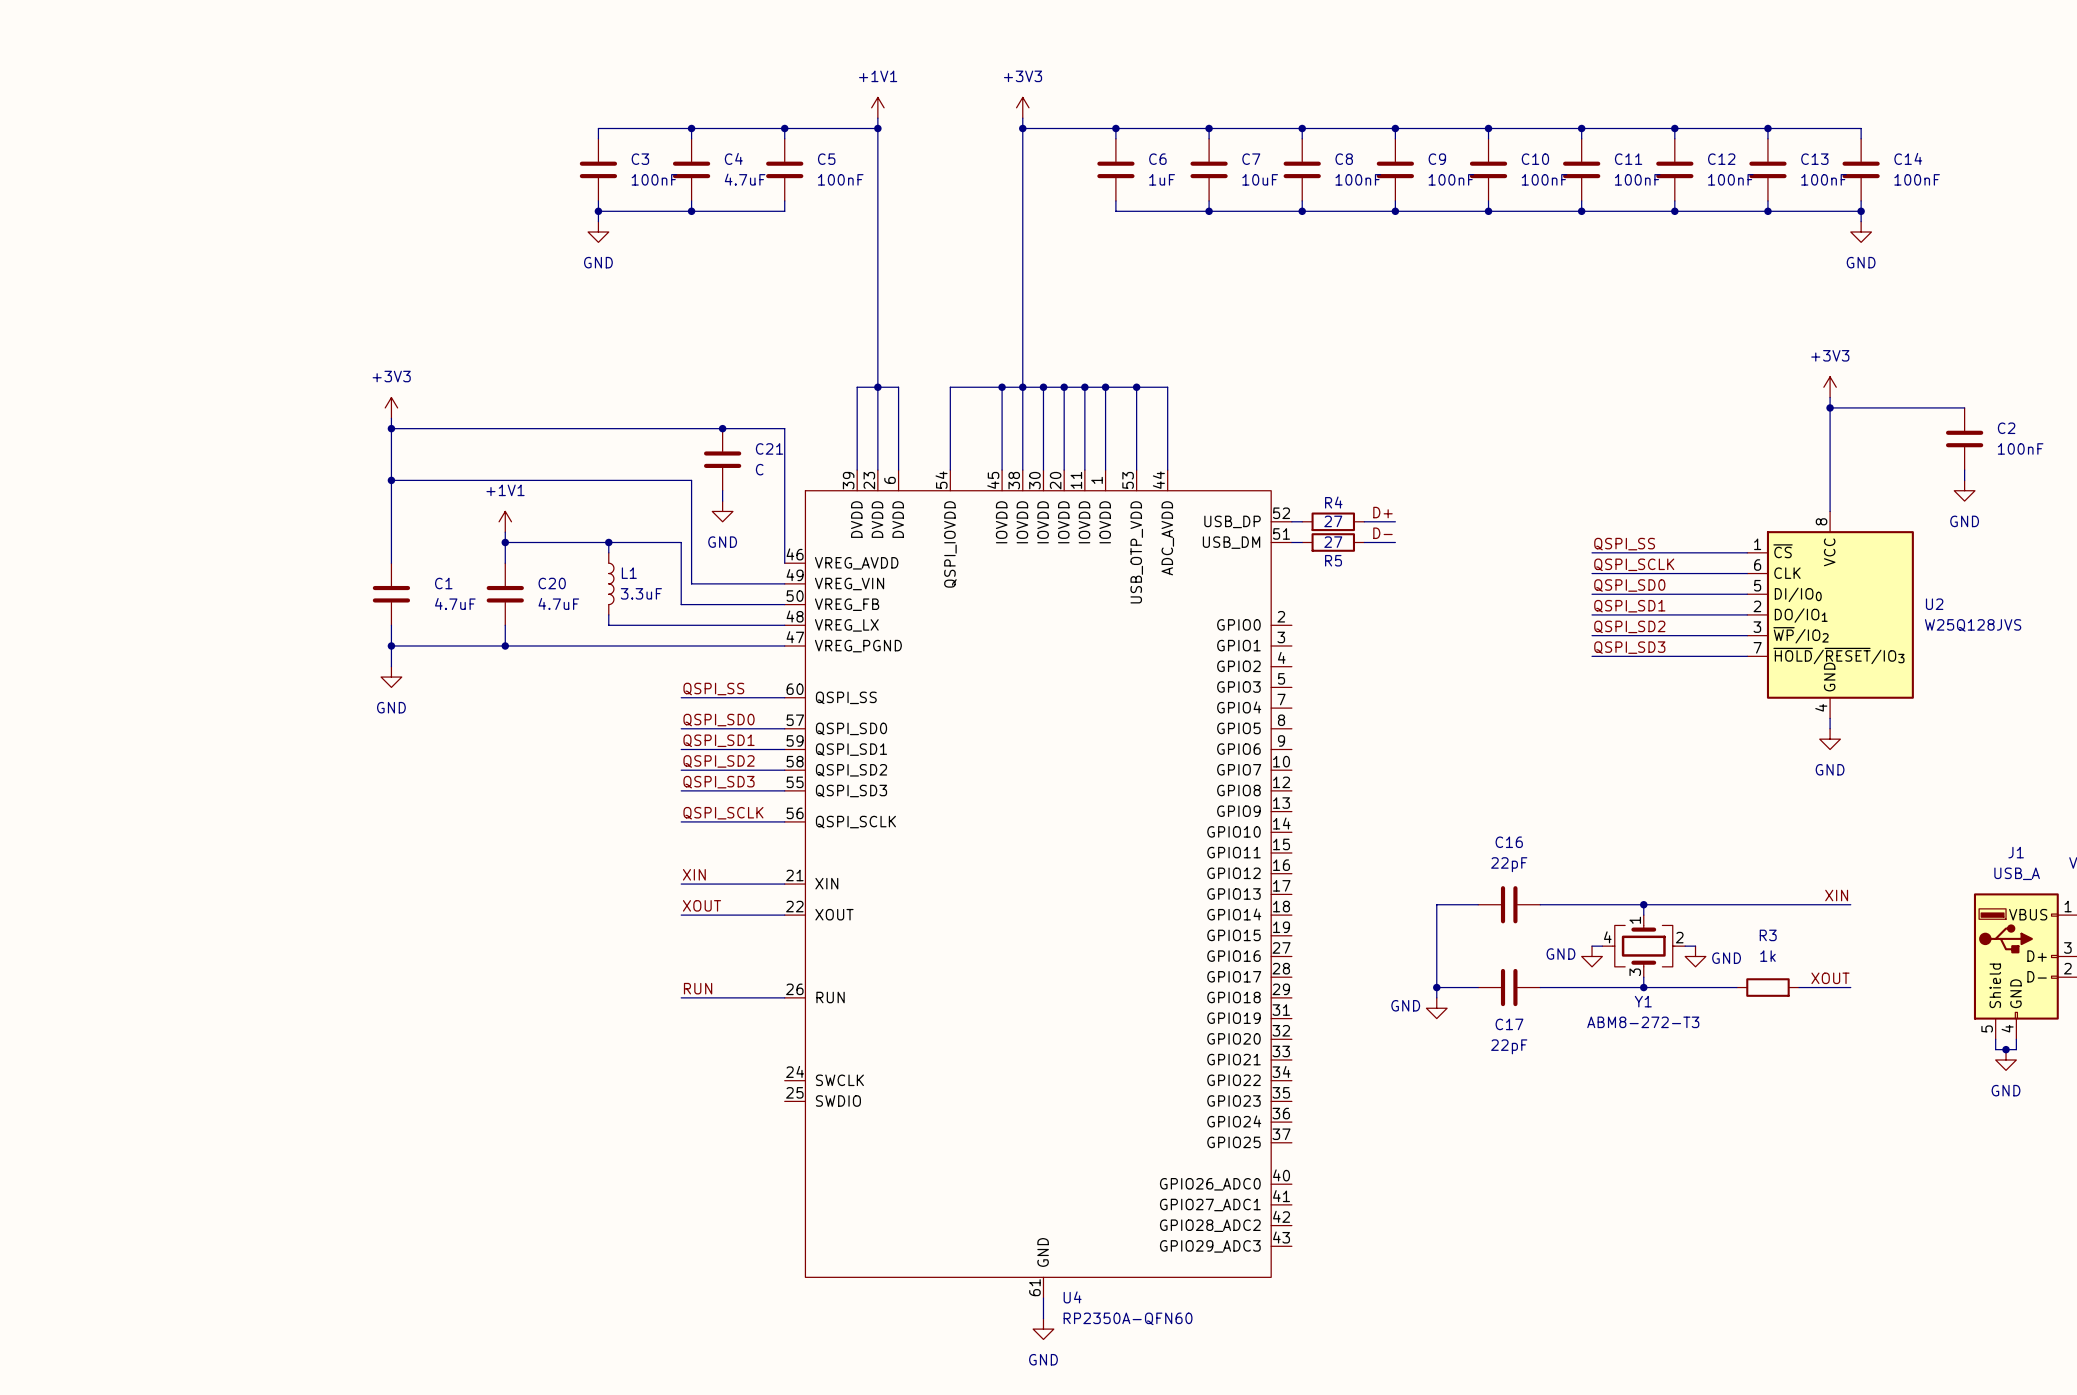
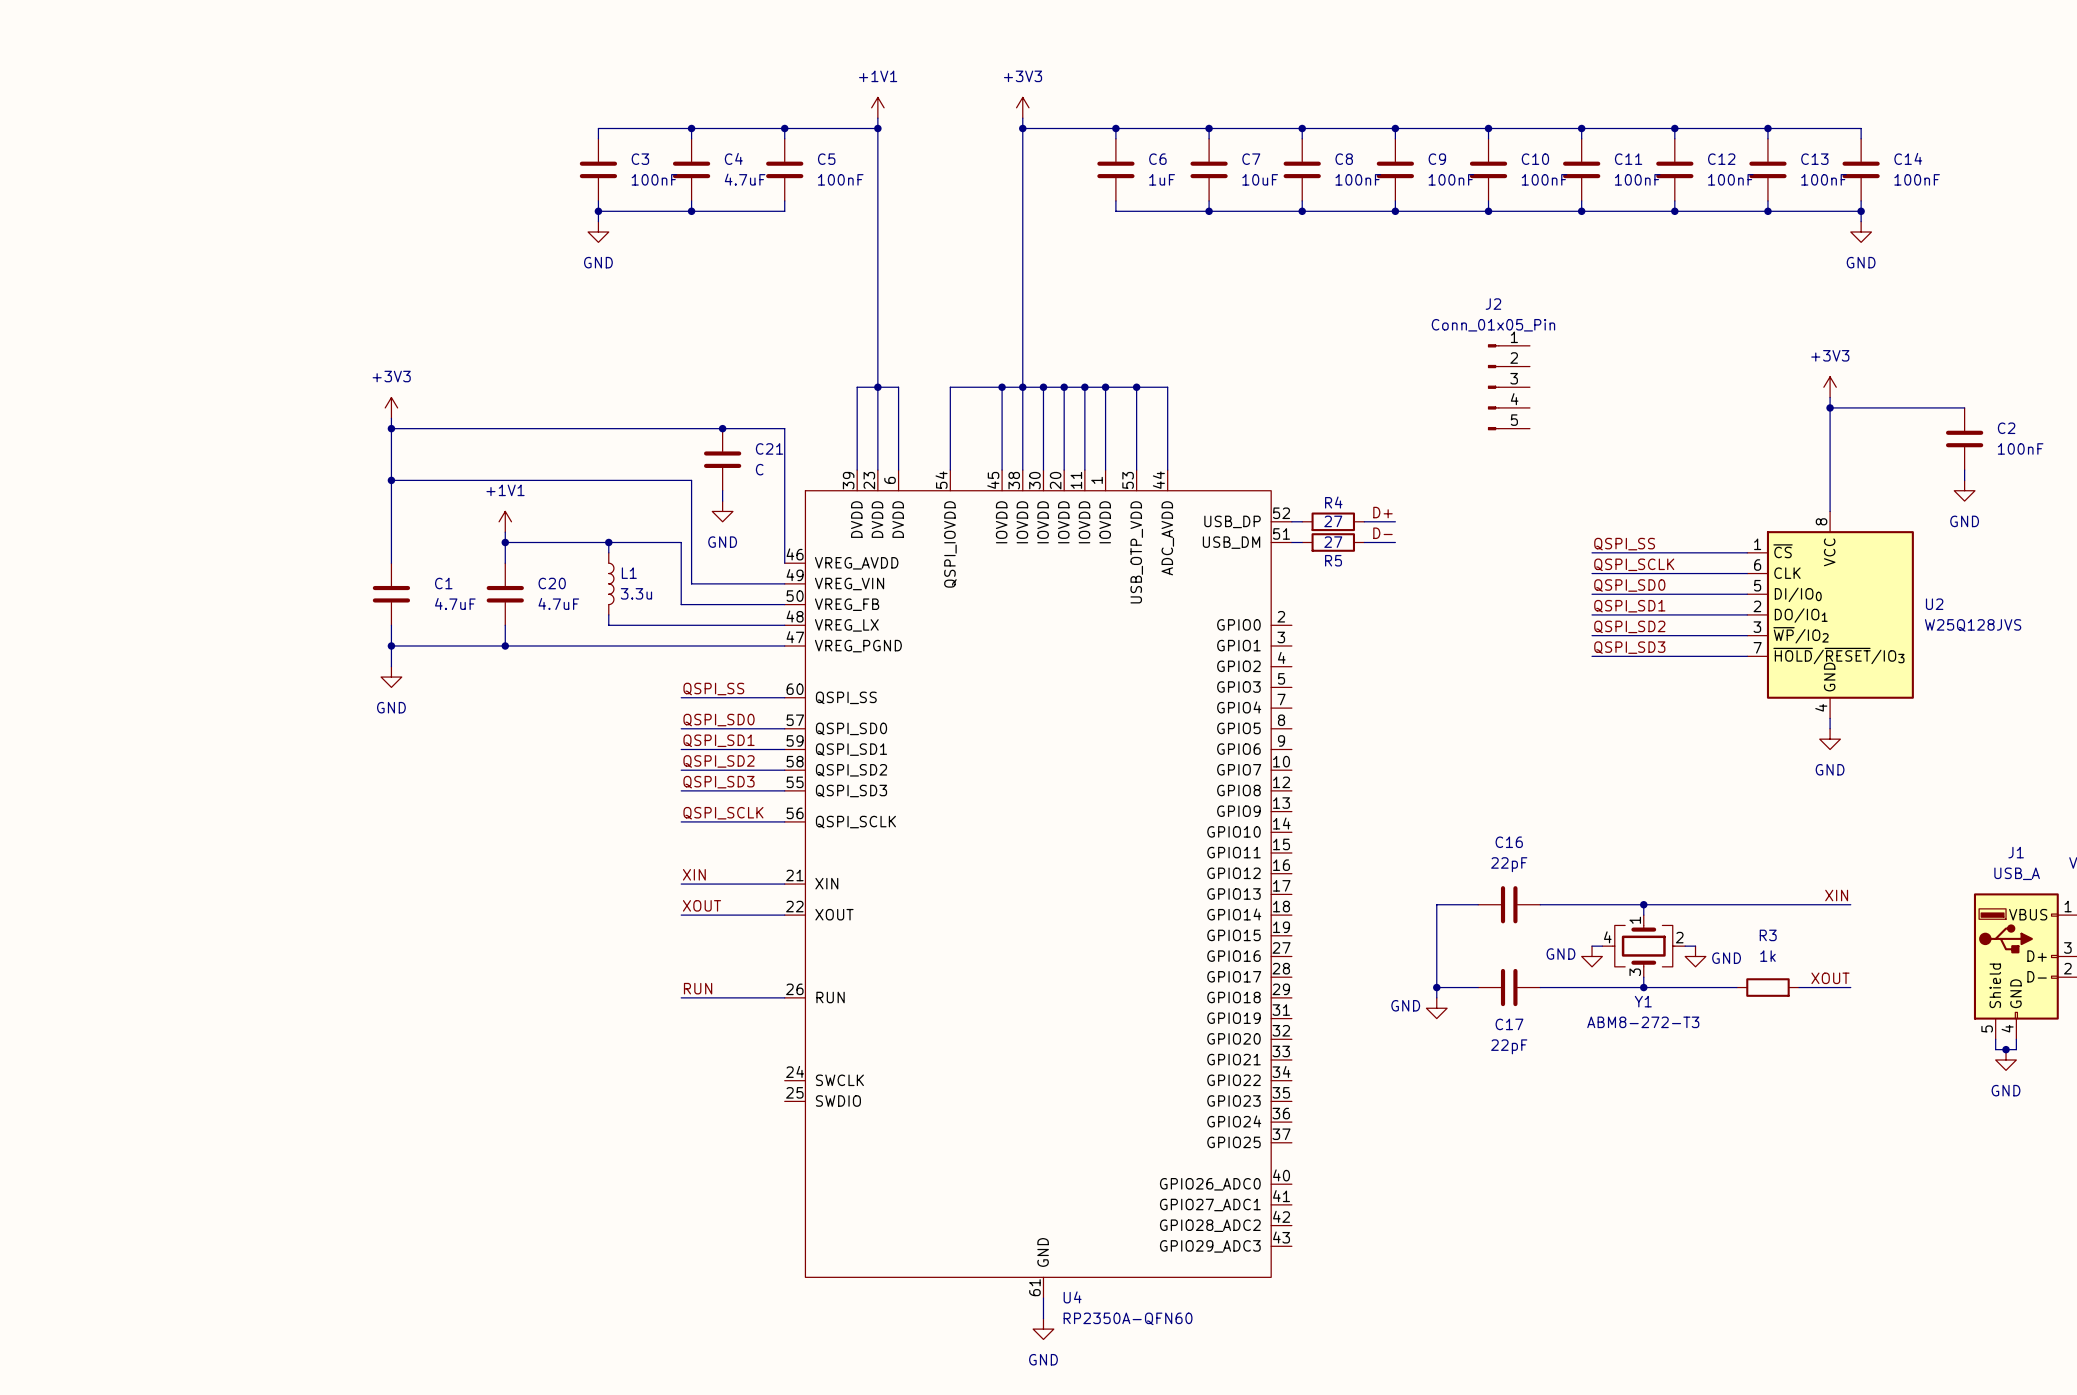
J2: none -> Conn_01x05_Pin (1508, 387)
L1 value: 3.3uF (641, 593) -> 3.3u (636, 593)

